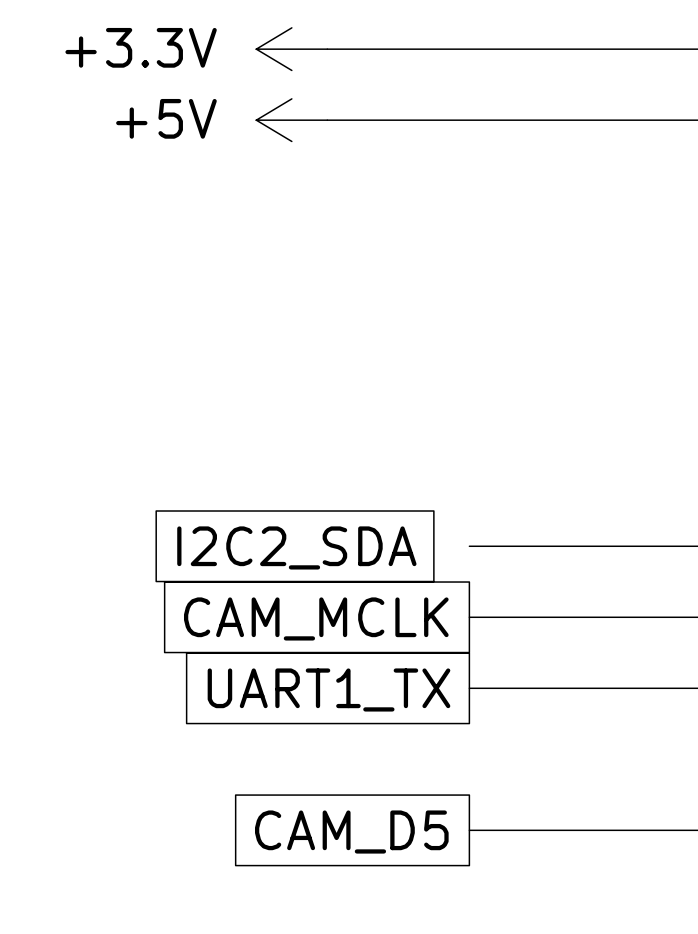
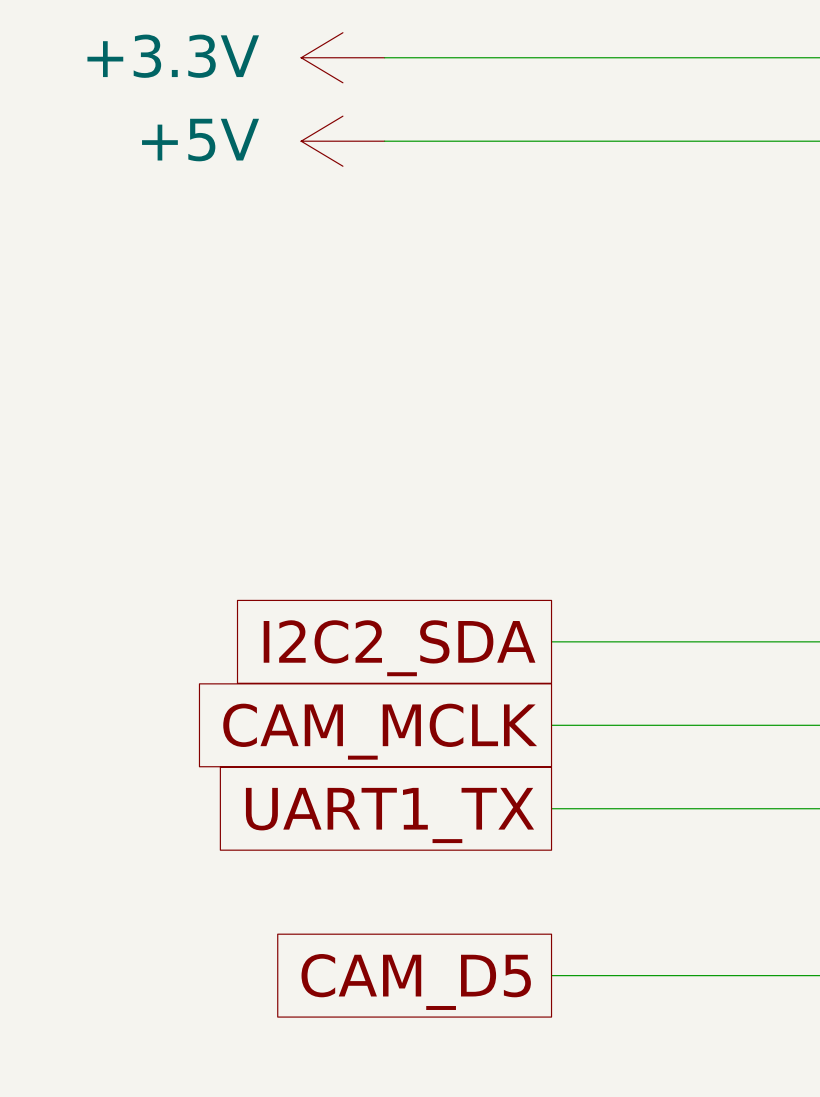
global label position: I2C2_SDA (296, 547) -> I2C2_SDA (399, 648)

